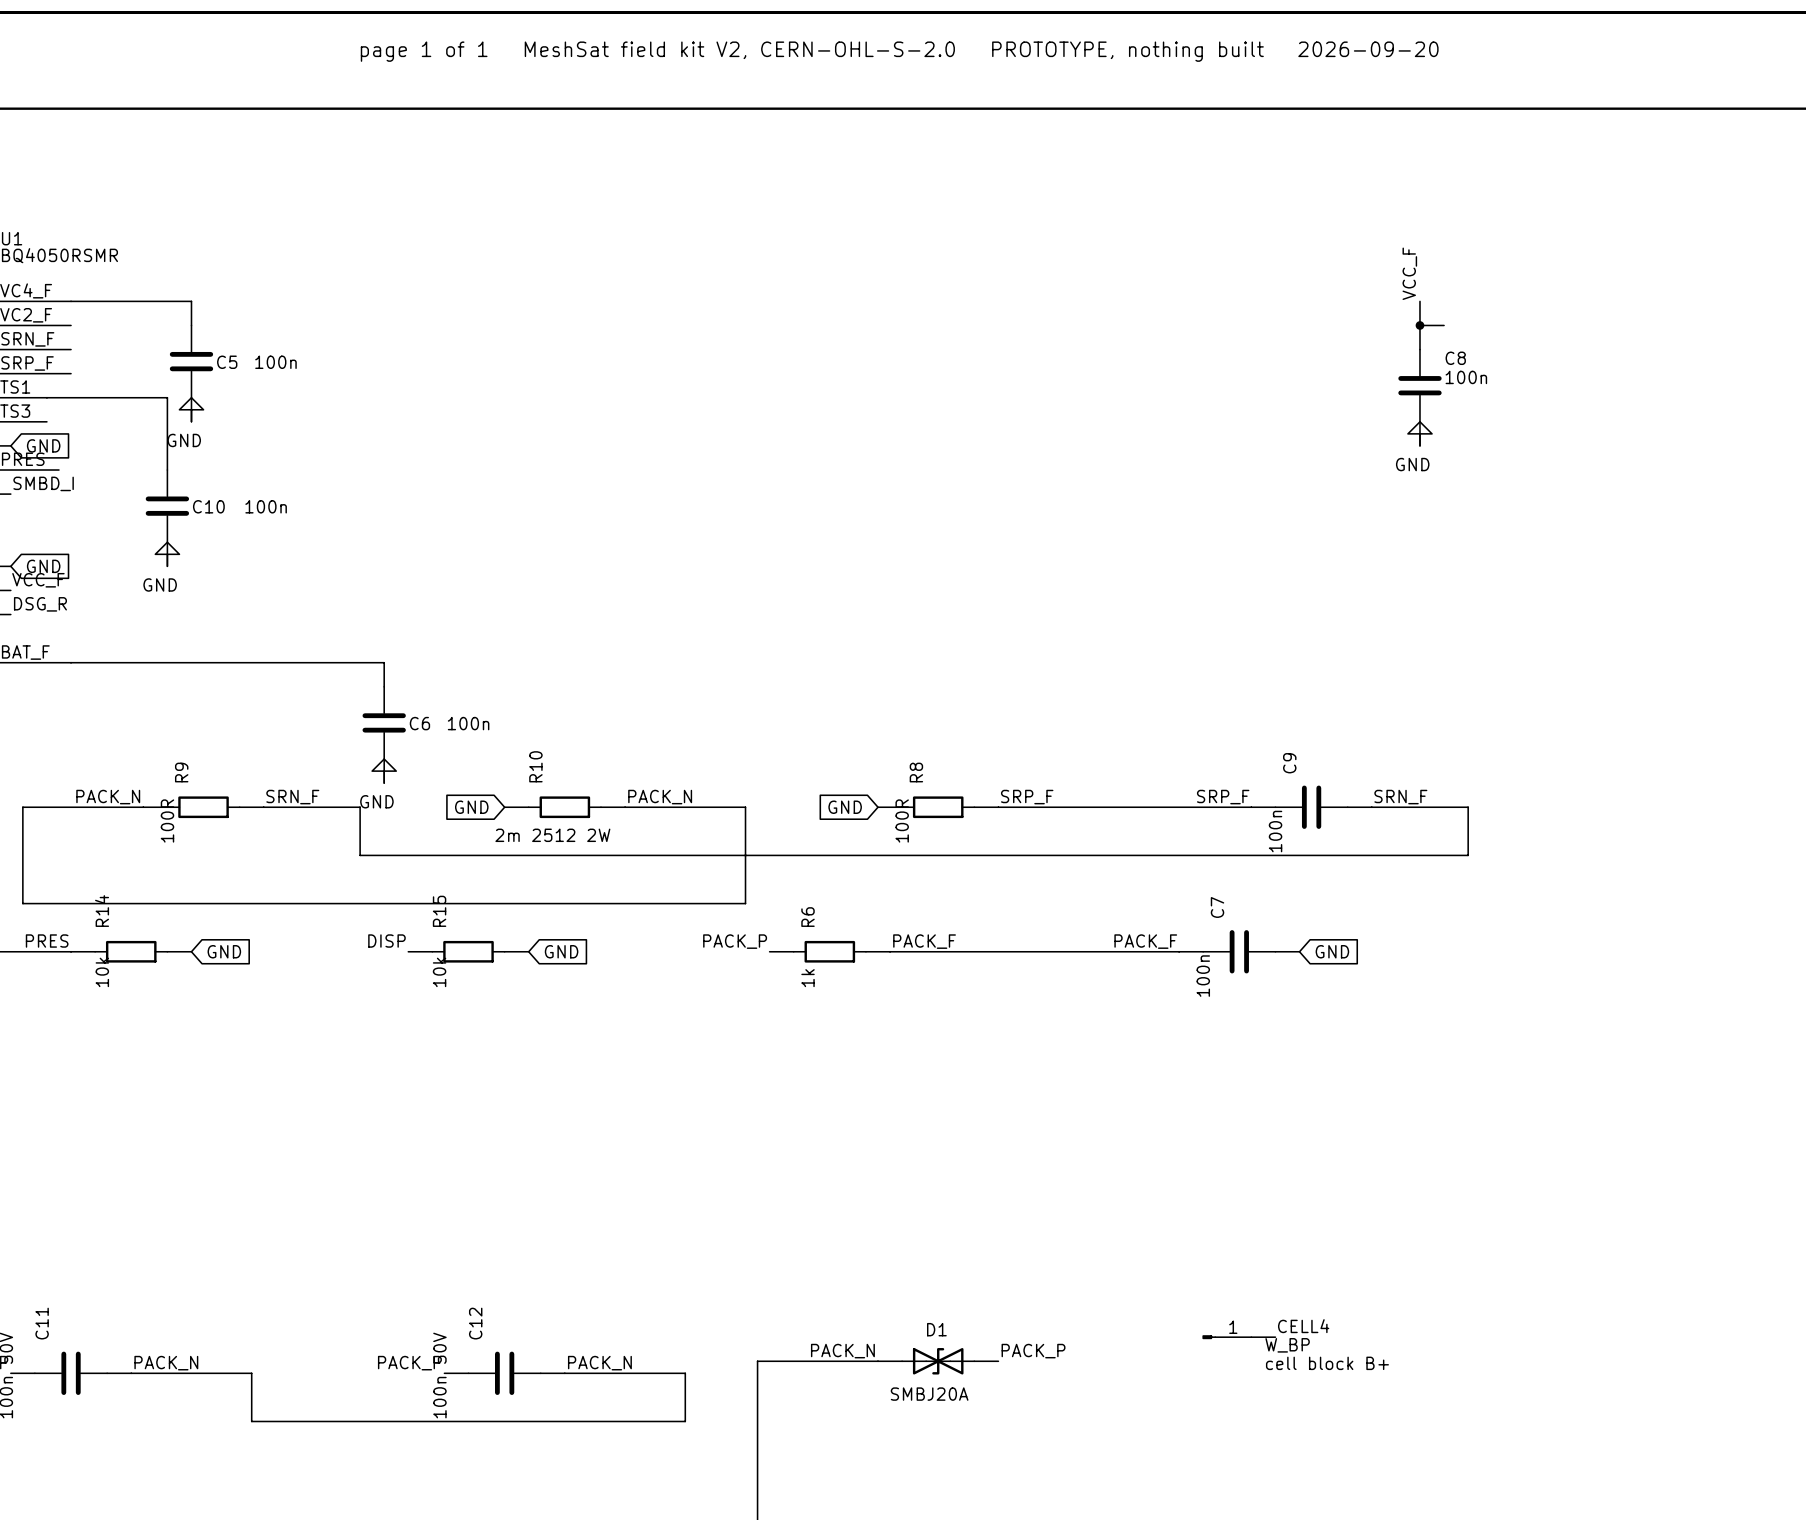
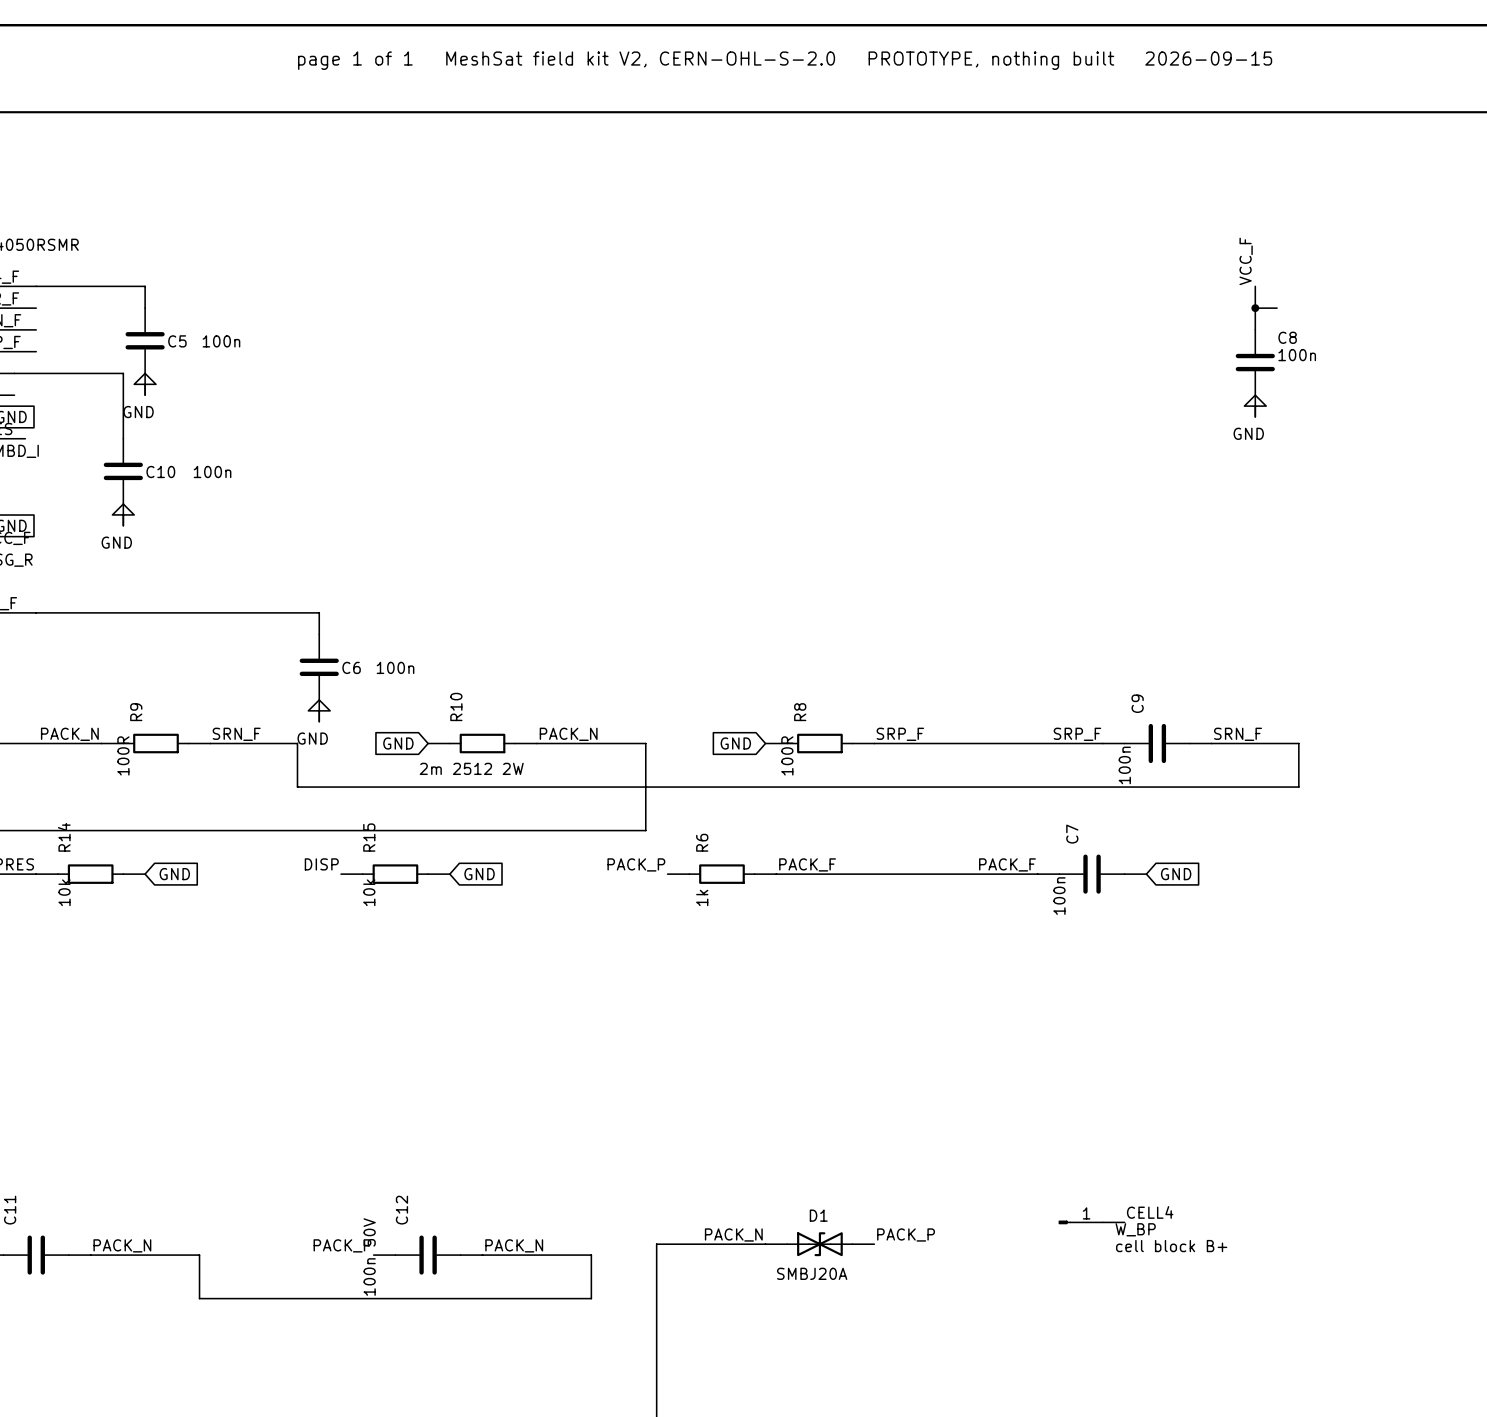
text: page 1 of 1 MeshSat field kit V2, CERN-OHL-S-2.0 PROTOTYPE, nothing built 2026-09-20 (899, 51) -> page 1 of 1 MeshSat field kit V2, CERN-OHL-S-2.0 PROTOTYPE, nothing built 2026-09-15 (785, 60)

